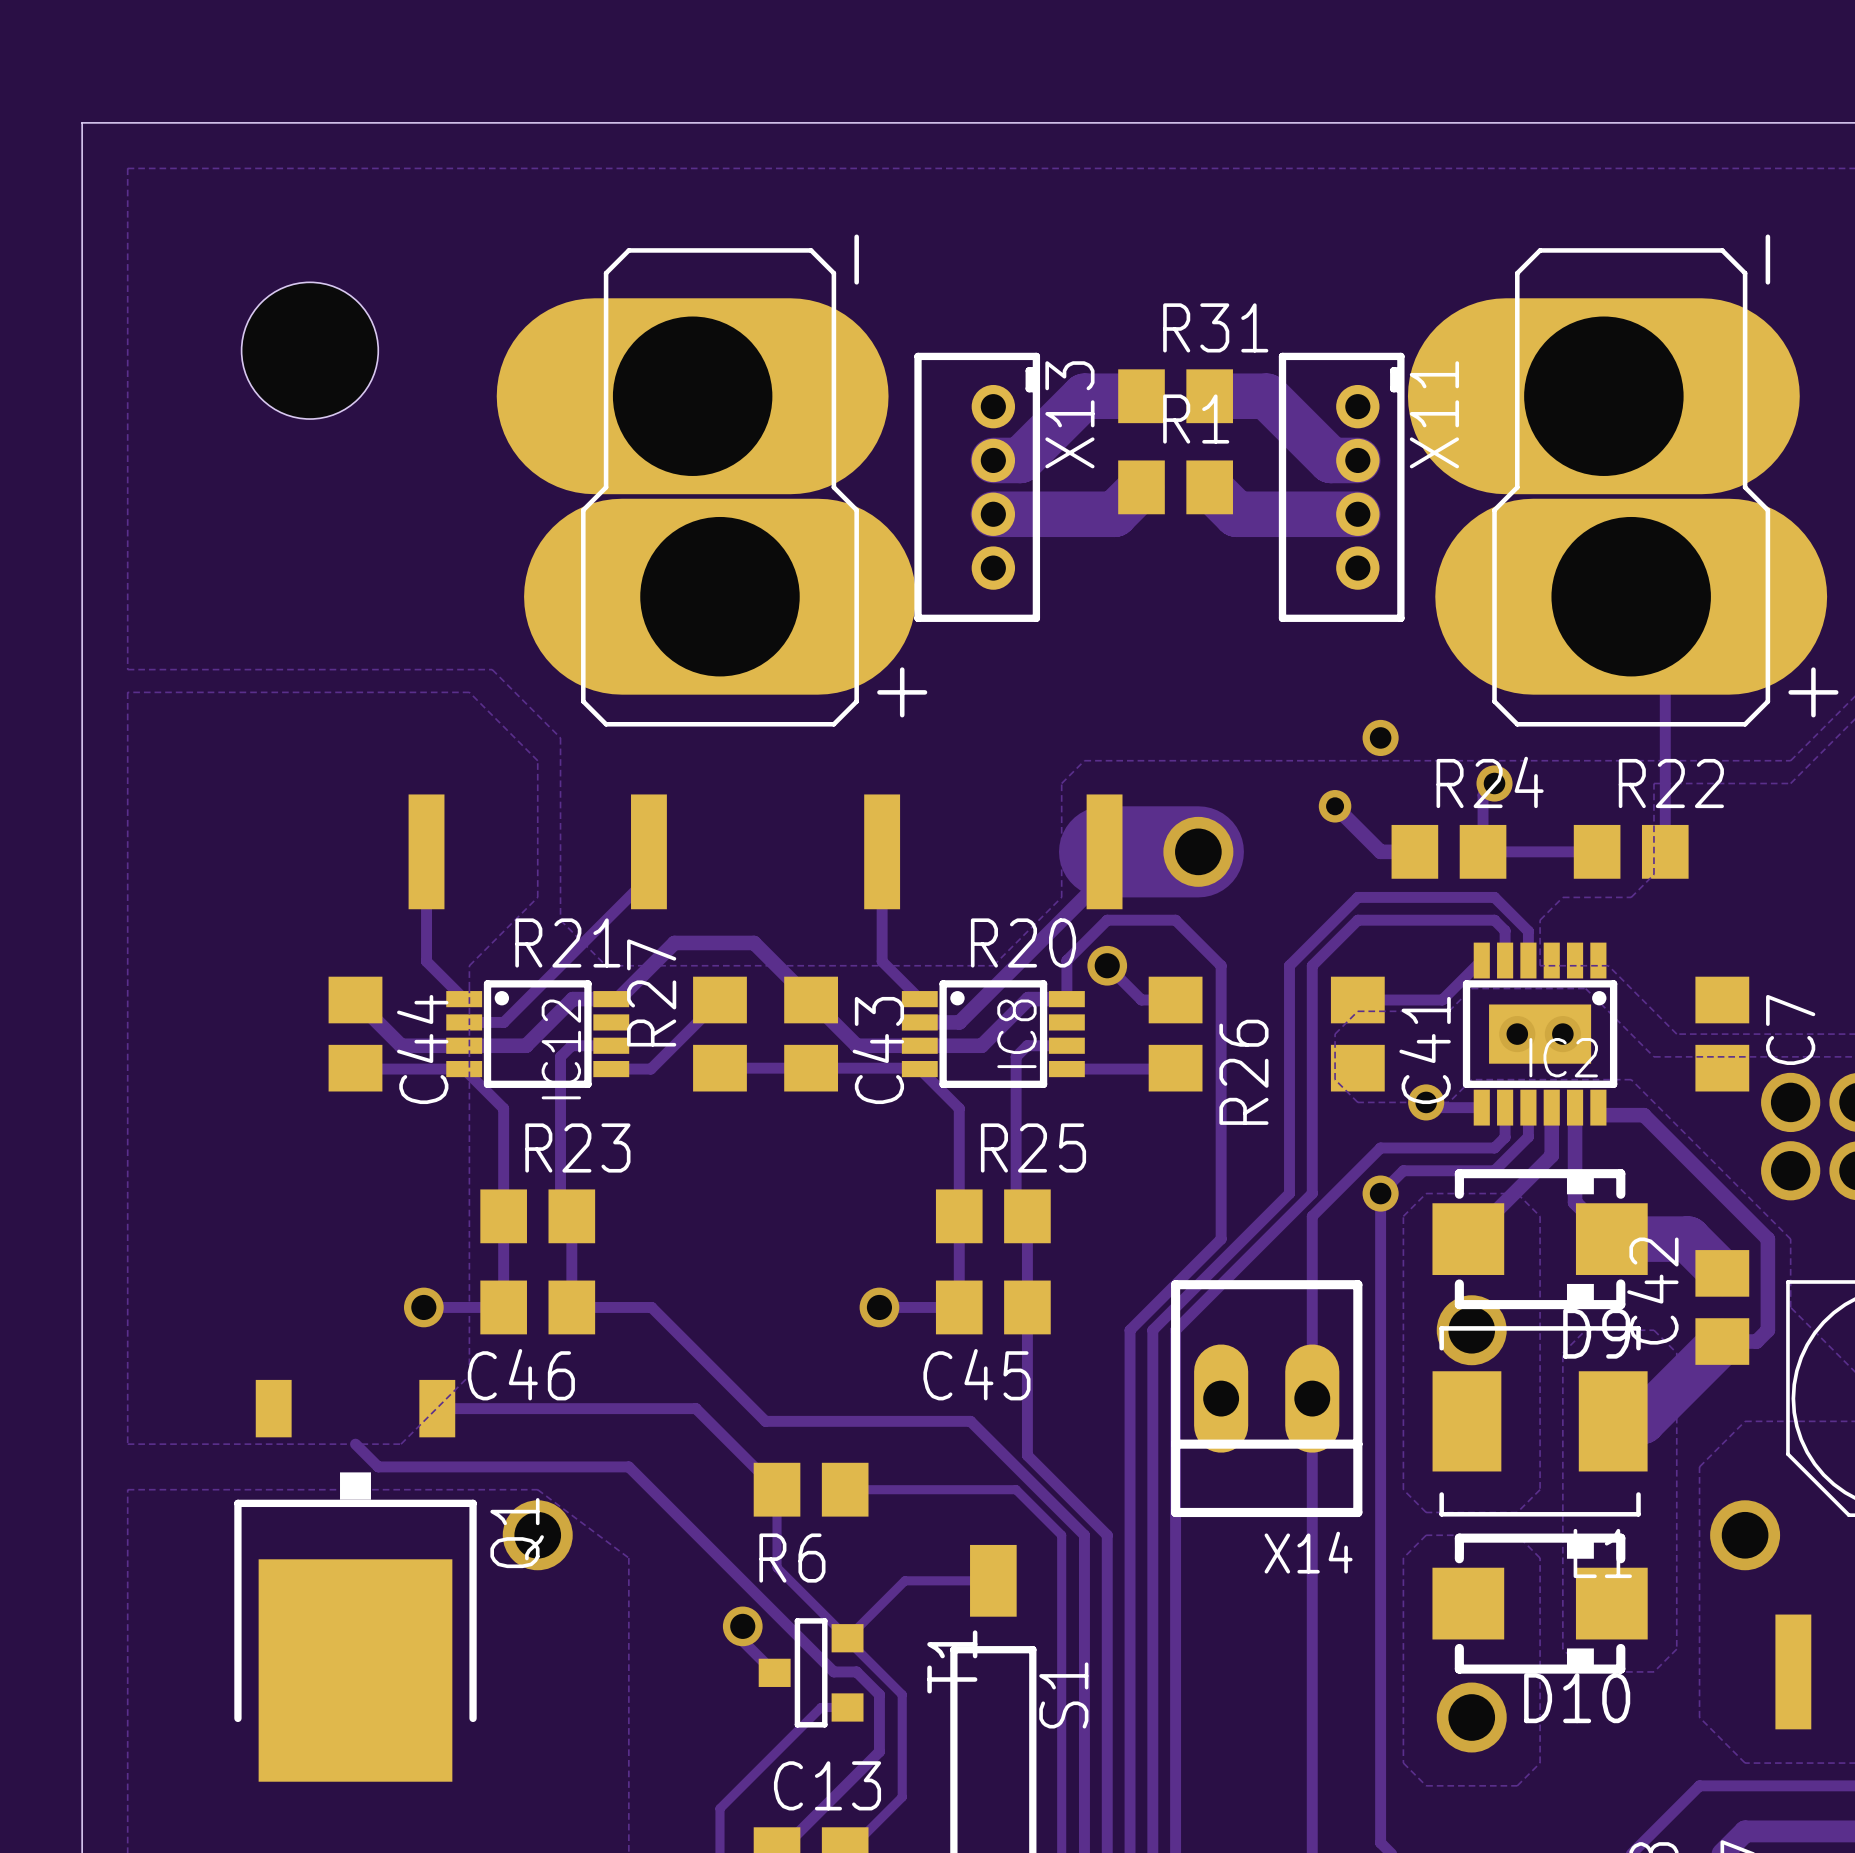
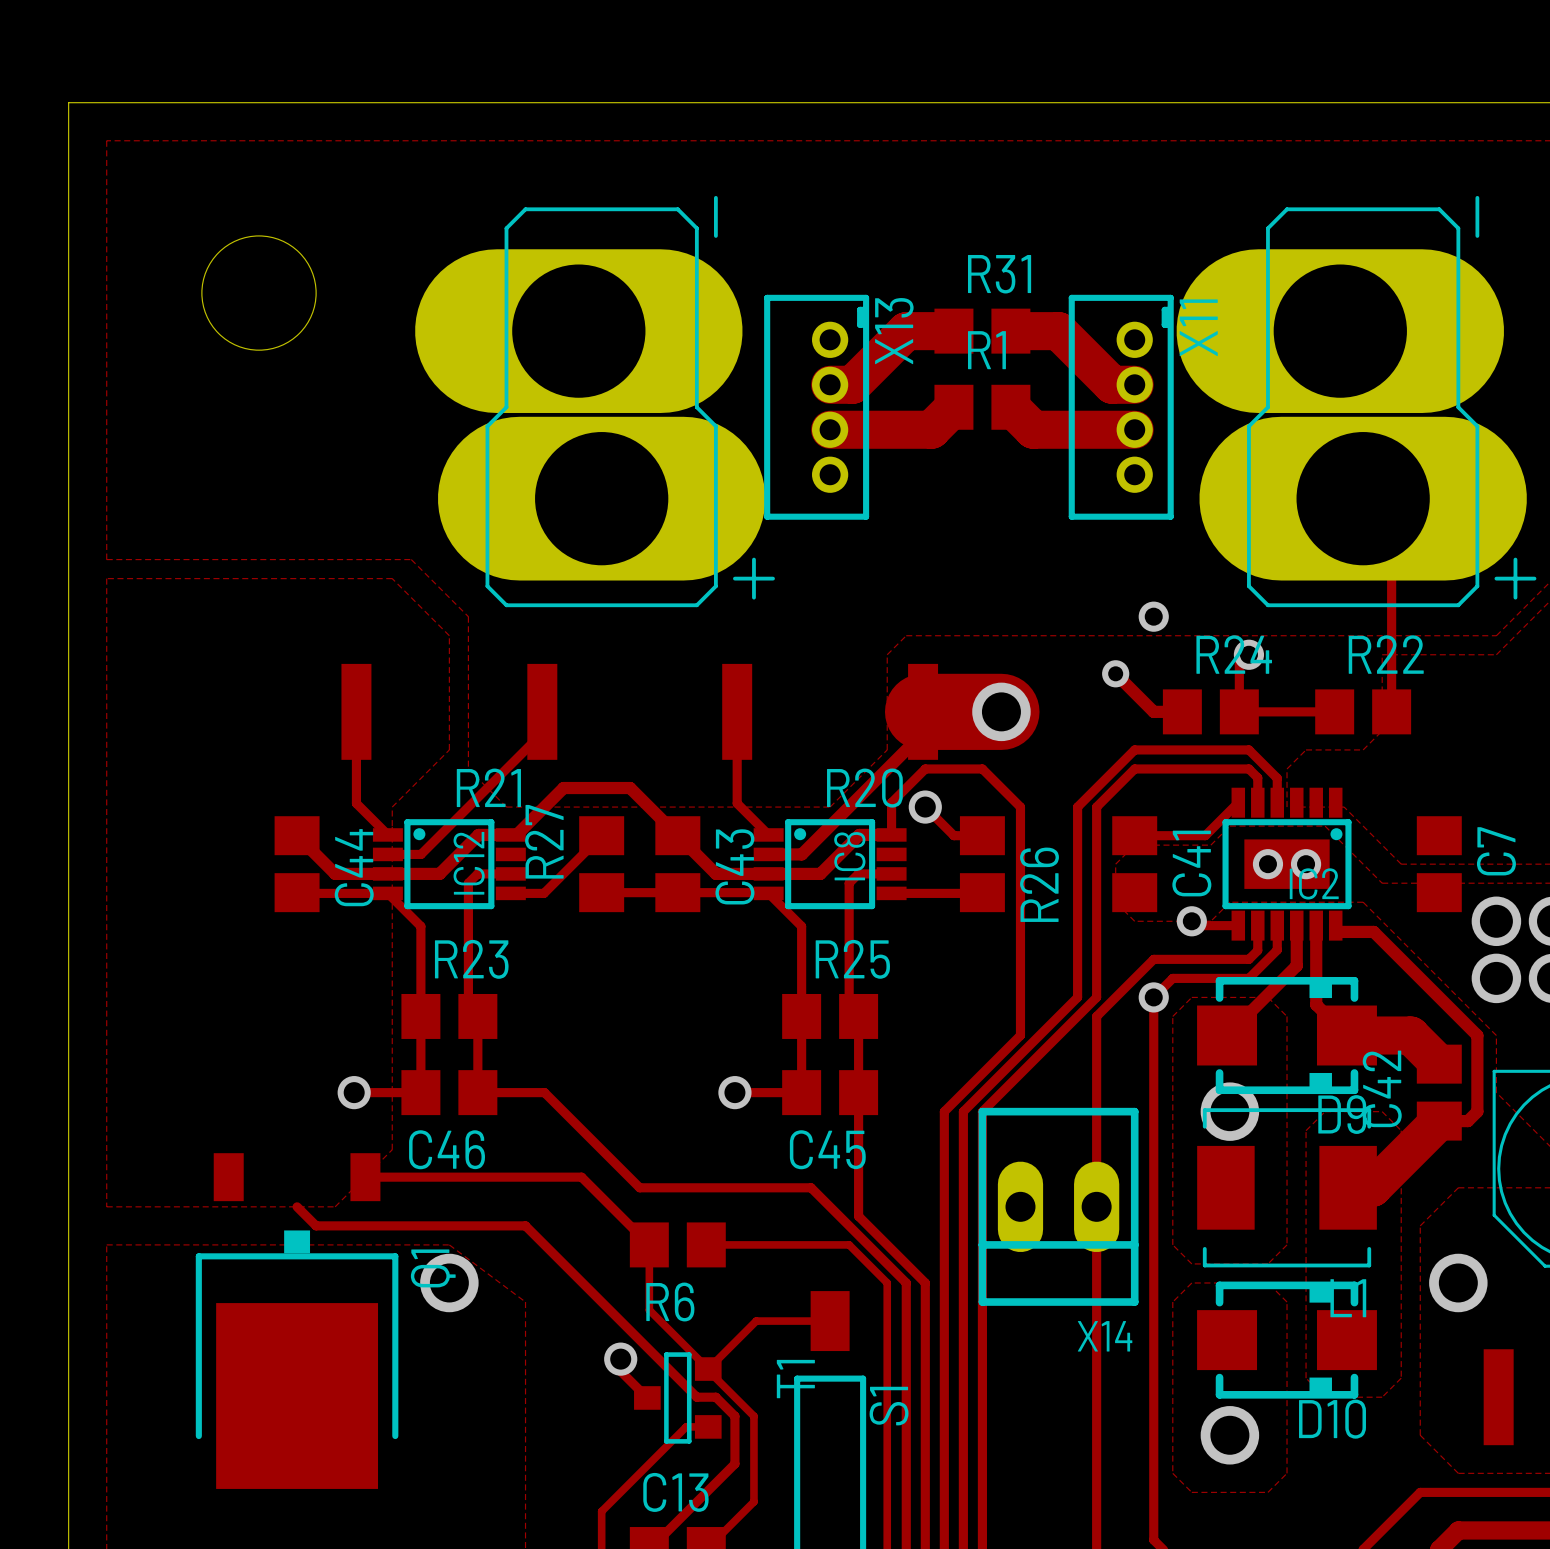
X14 position: (1266, 1398) -> (1058, 1206)

